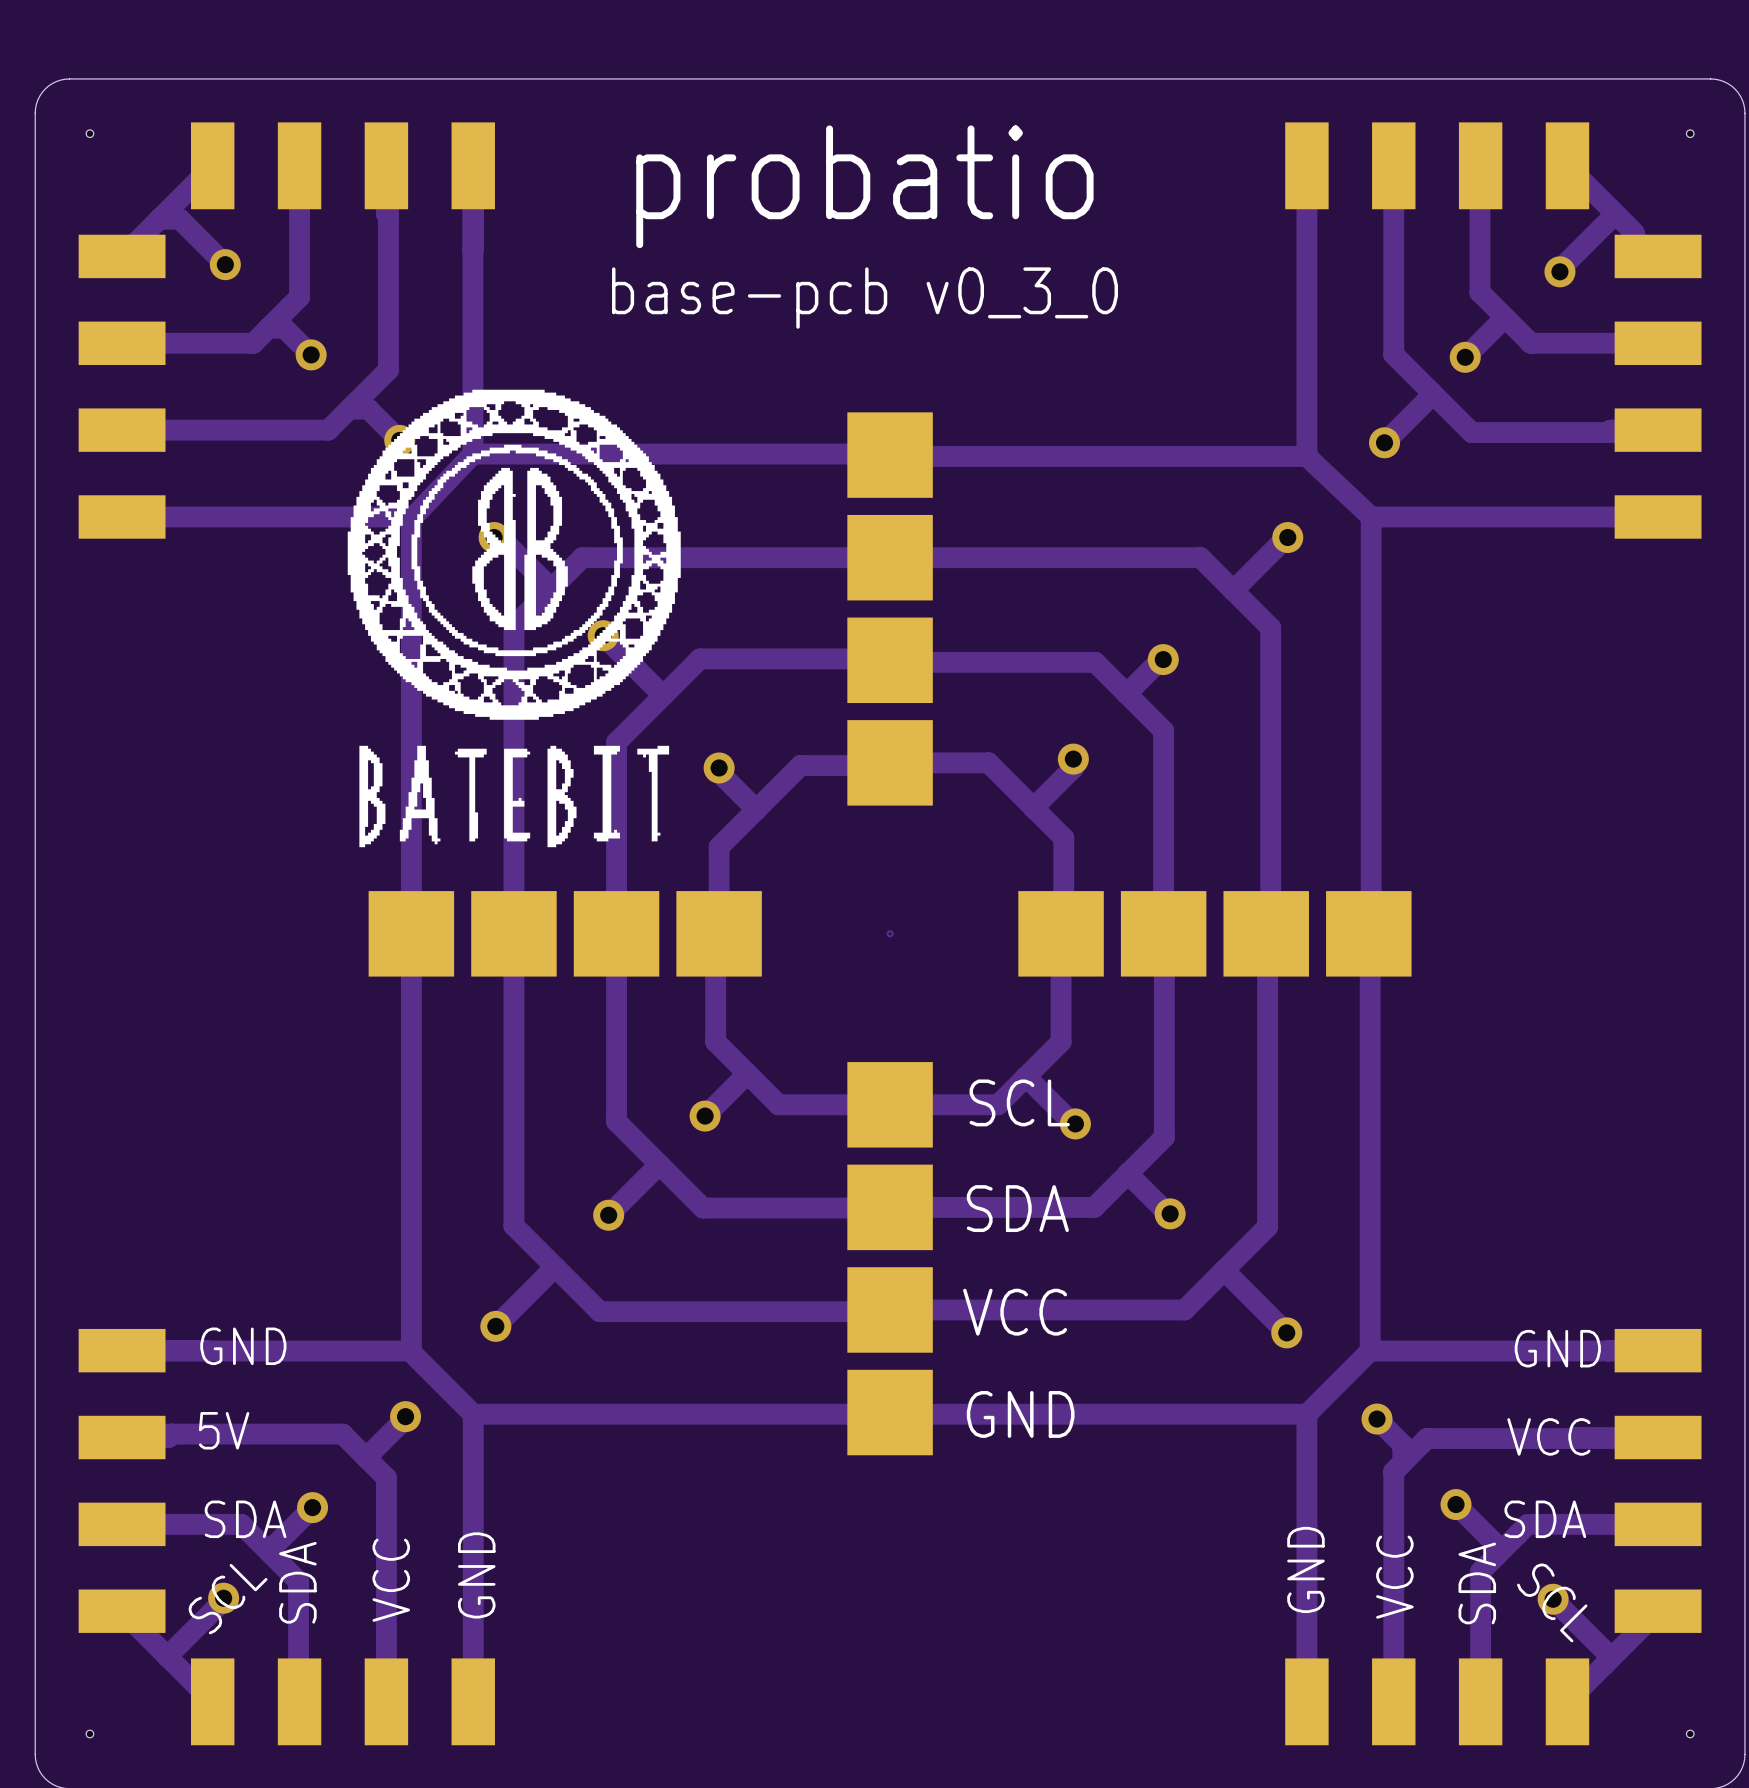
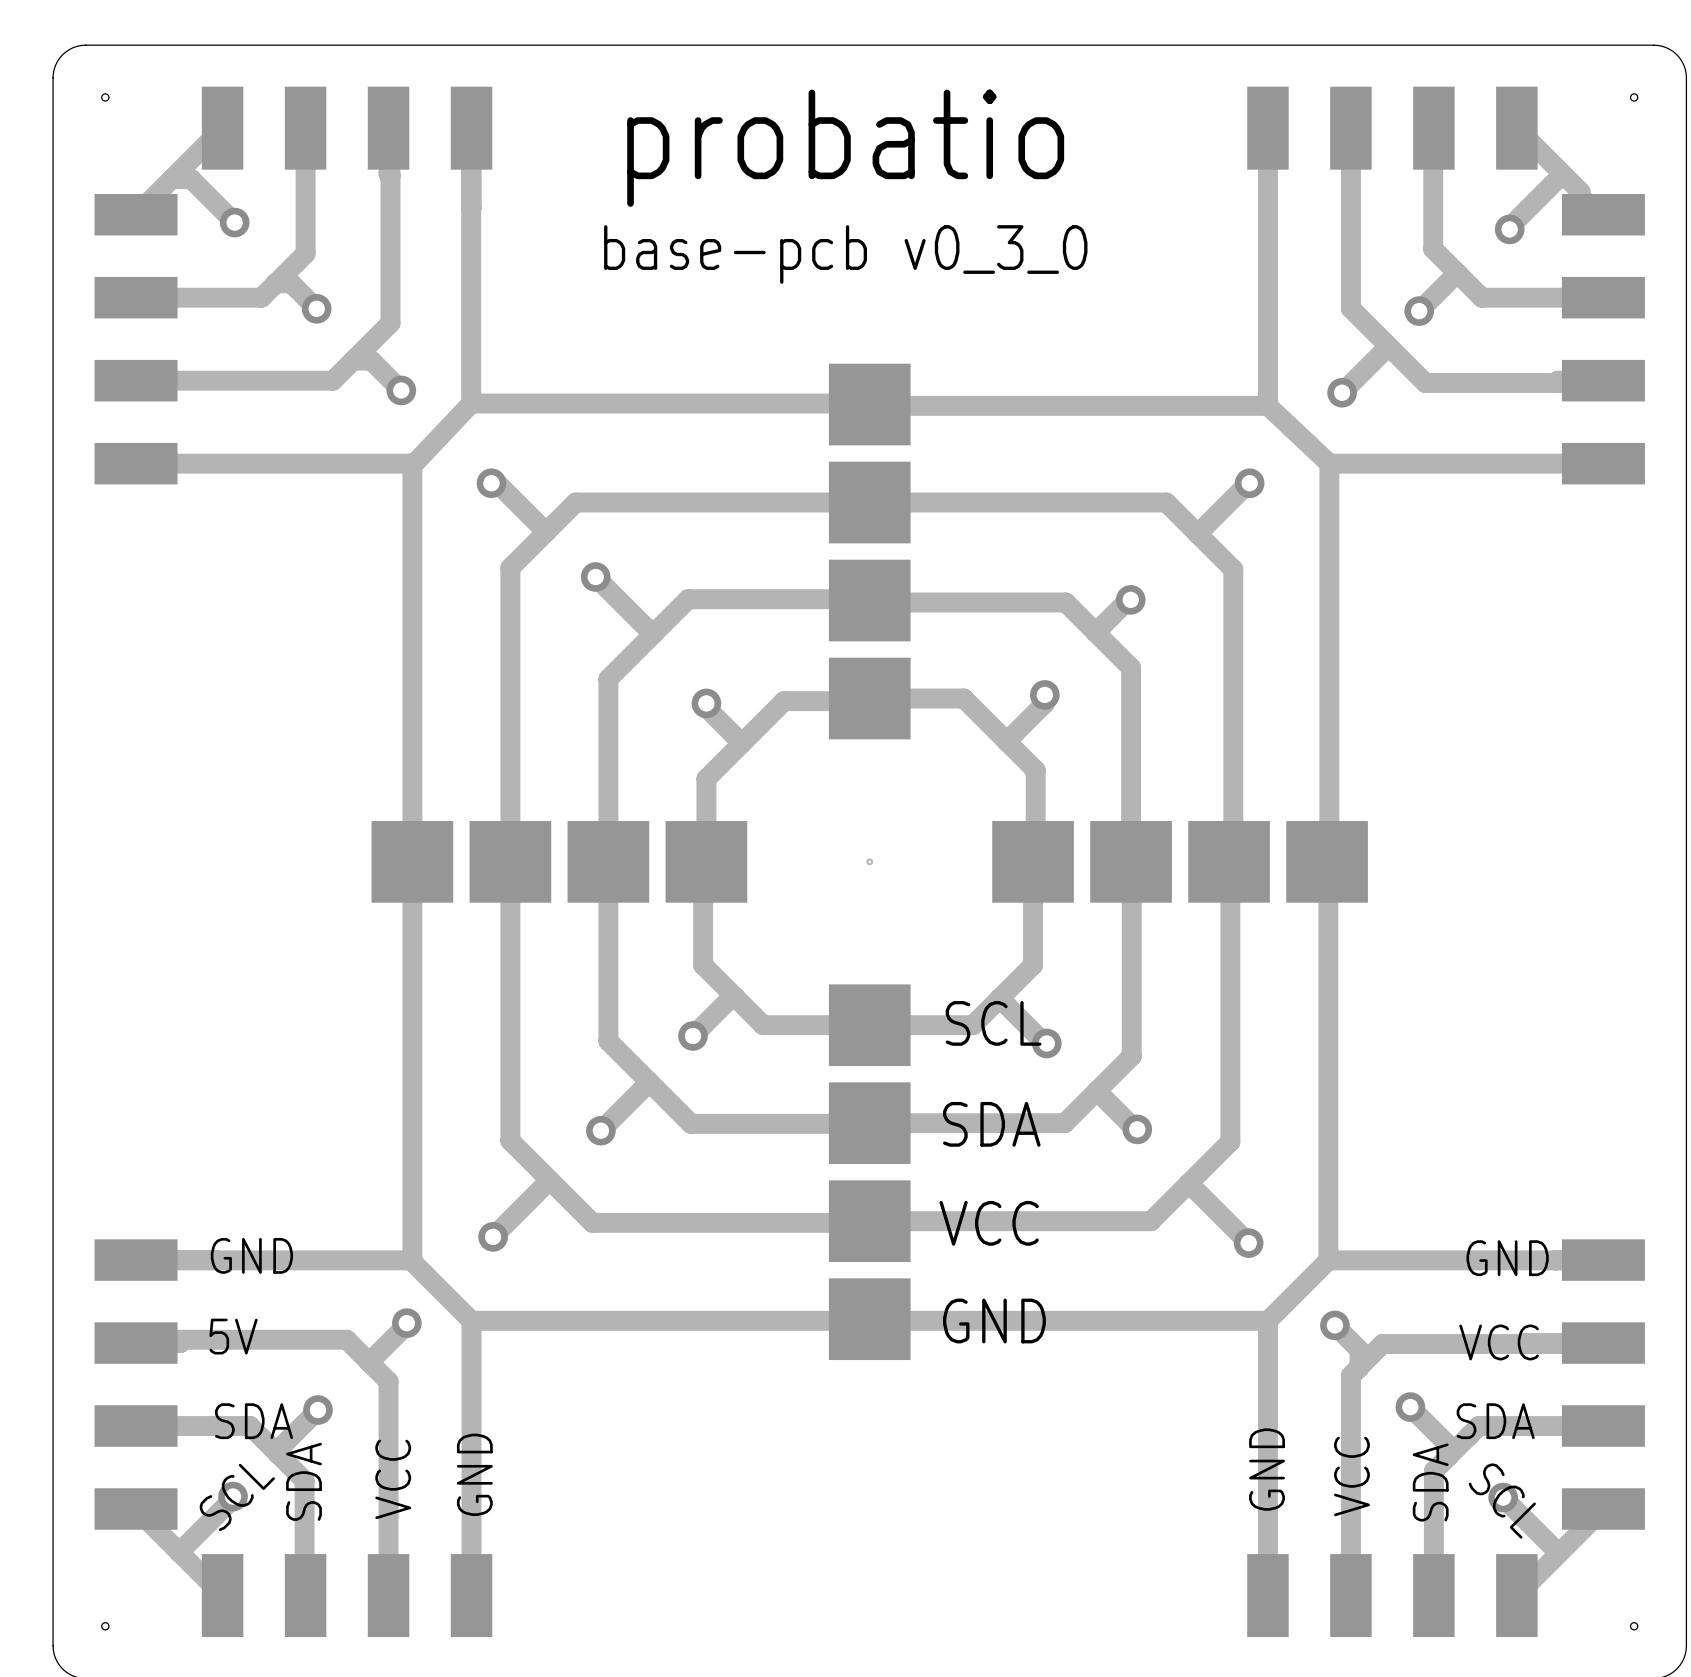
drawing: [347, 389, 681, 848] -> none

